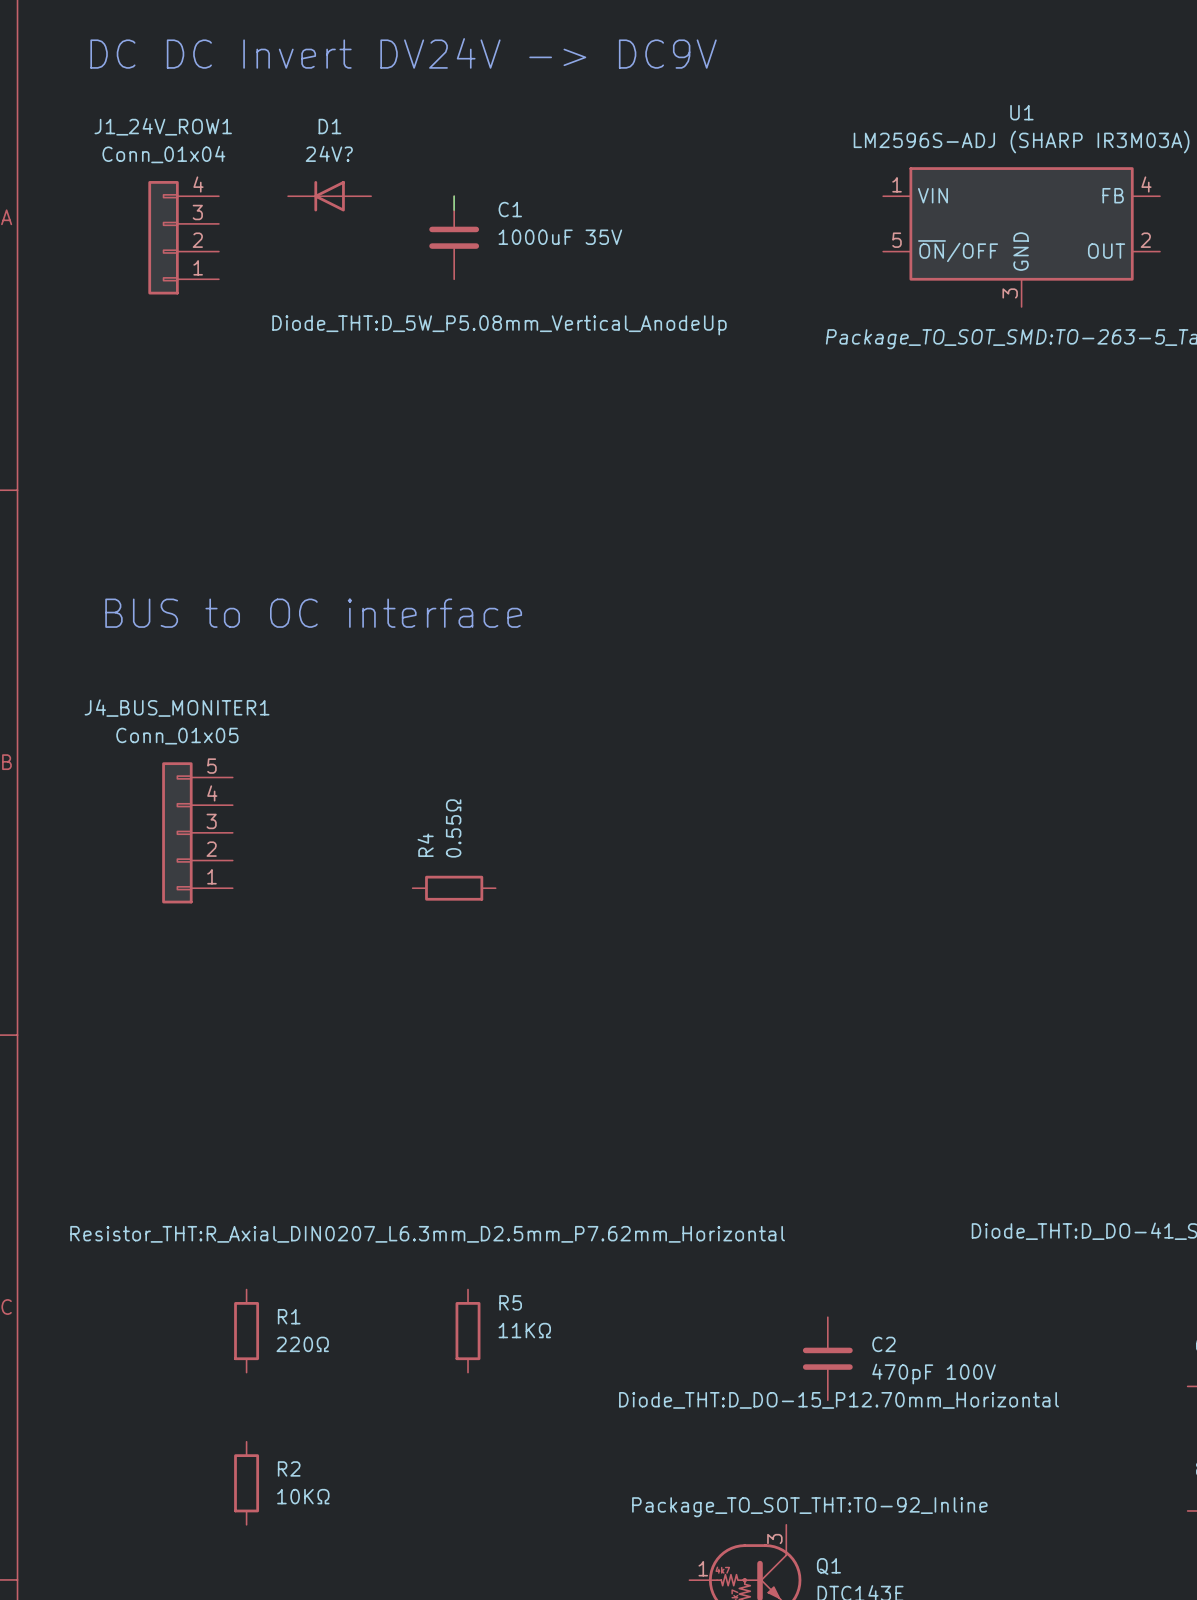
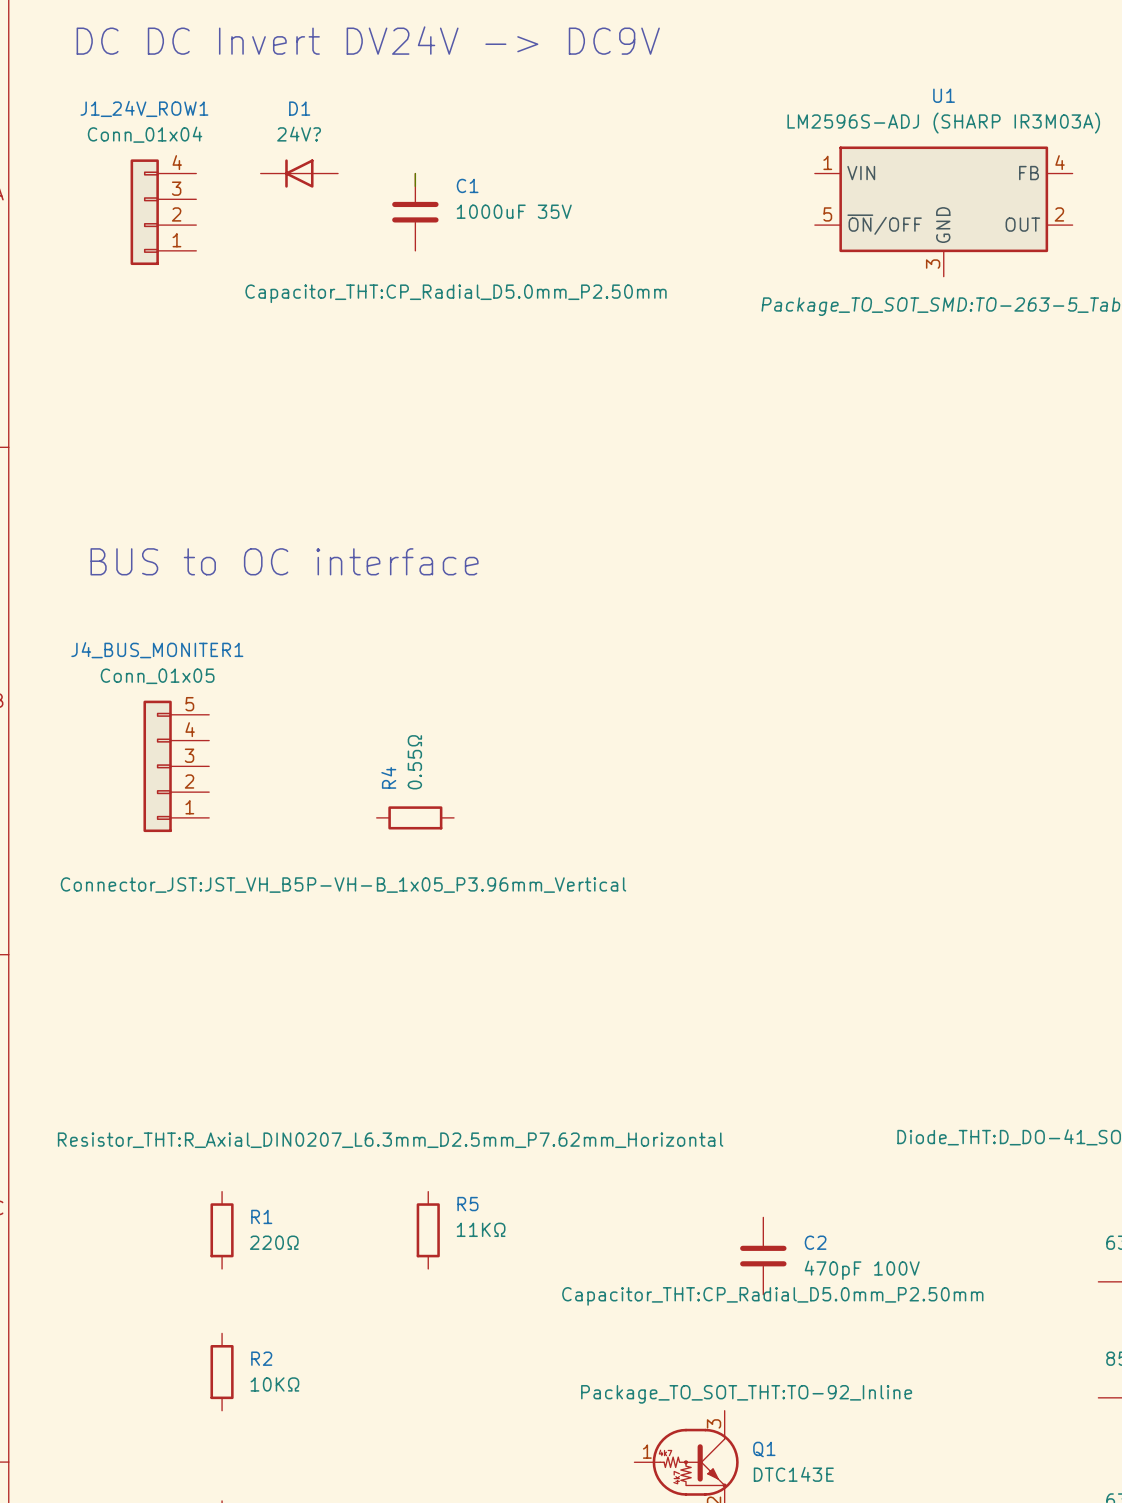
C1 text: Diode_THT:D_5W_P5.08mm_Vertical_AnodeUp (499, 325) -> Capacitor_THT:CP_Radial_D5.0mm_P2.50mm (456, 293)
J4_BUS_MONITER1 text: none -> Connector_JST:JST_VH_B5P-VH-B_1x05_P3.96mm_Vertical (343, 885)
C2 text: Diode_THT:D_DO-15_P12.70mm_Horizontal (839, 1400) -> Capacitor_THT:CP_Radial_D5.0mm_P2.50mm (772, 1296)

